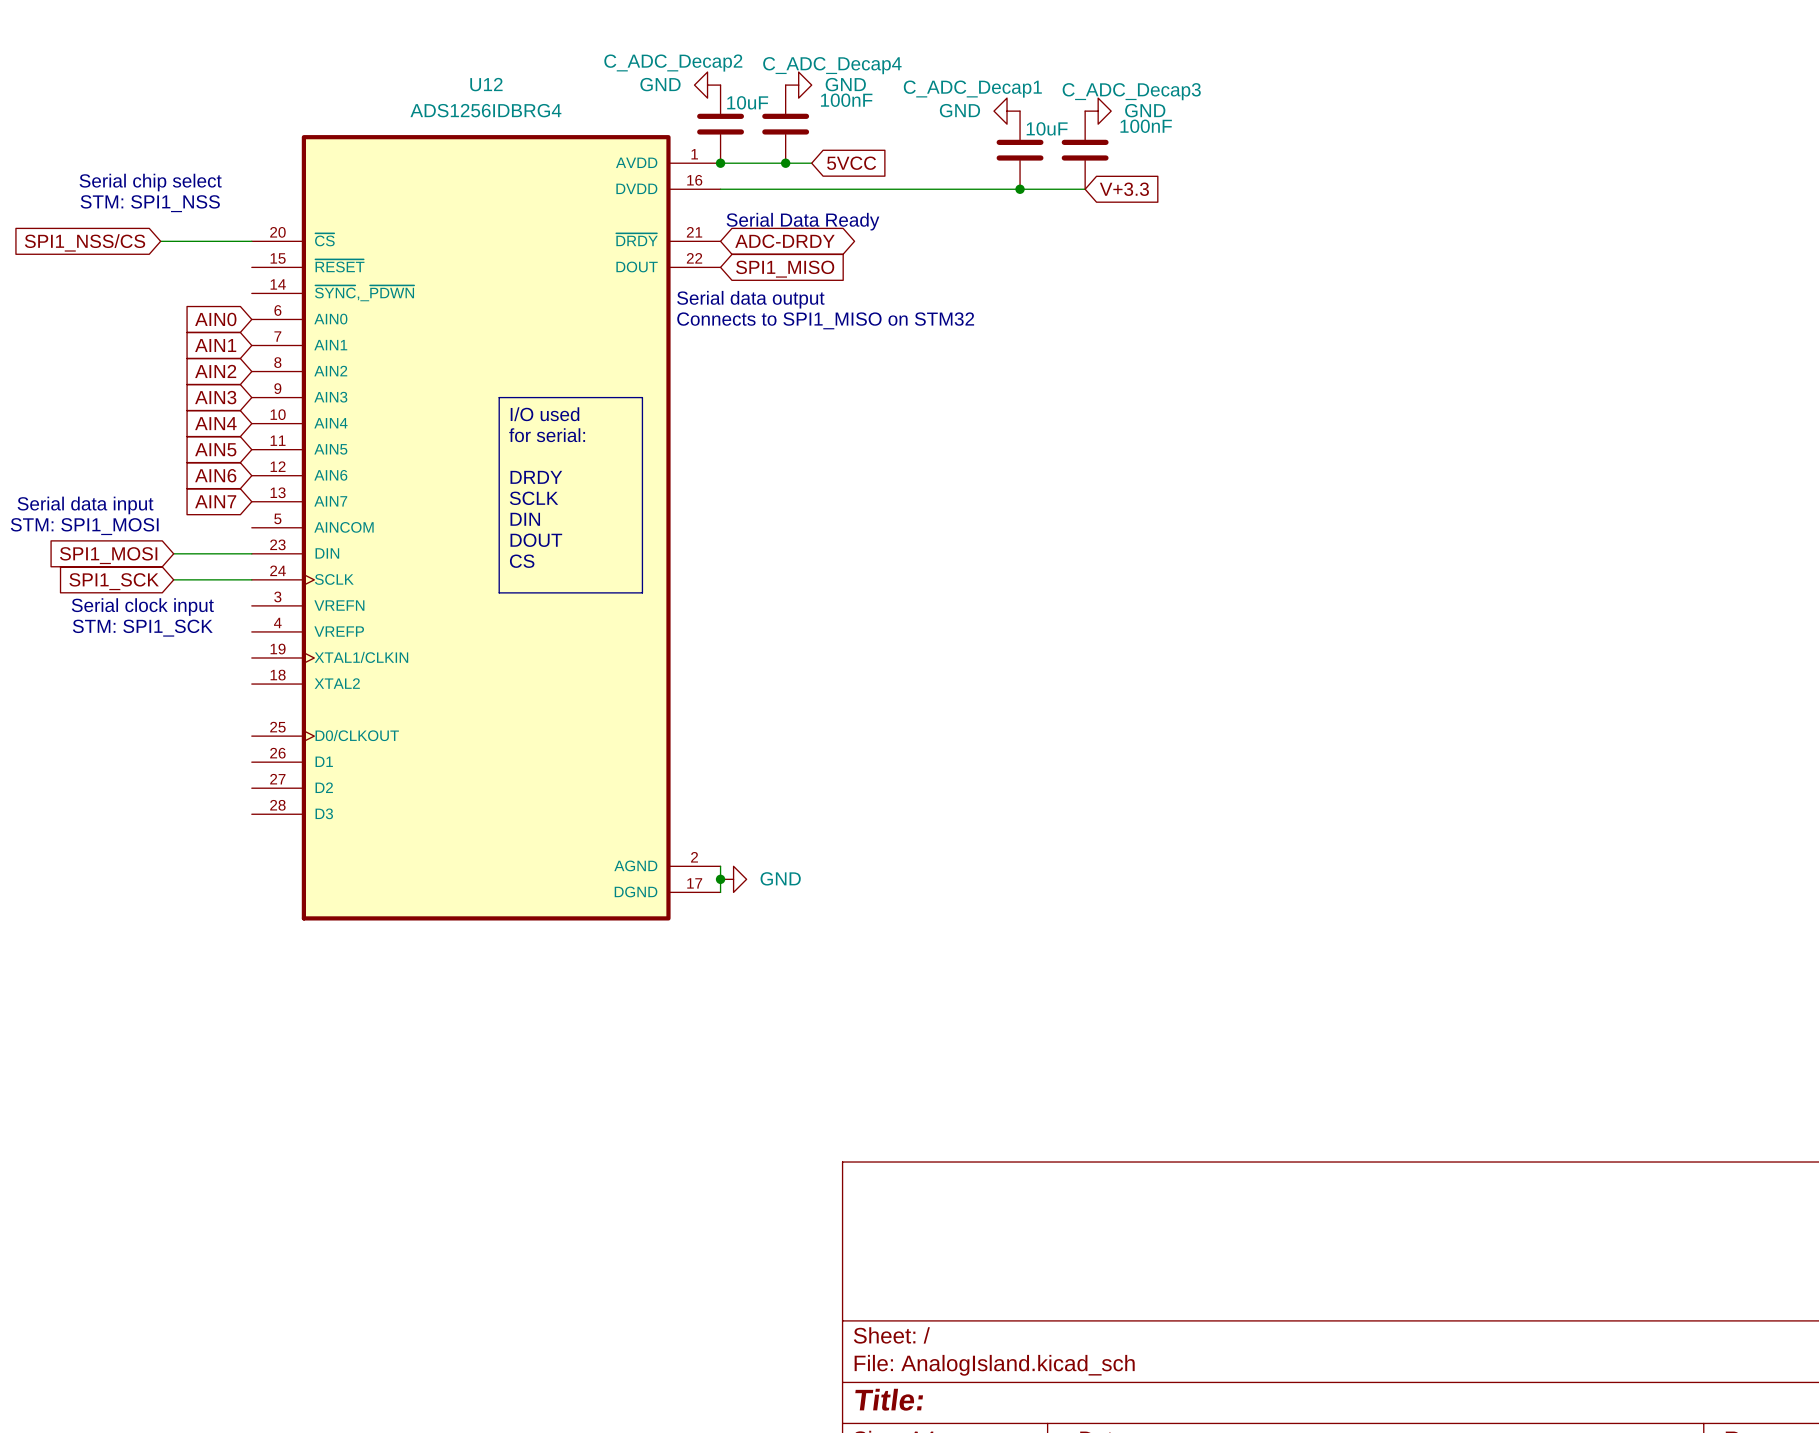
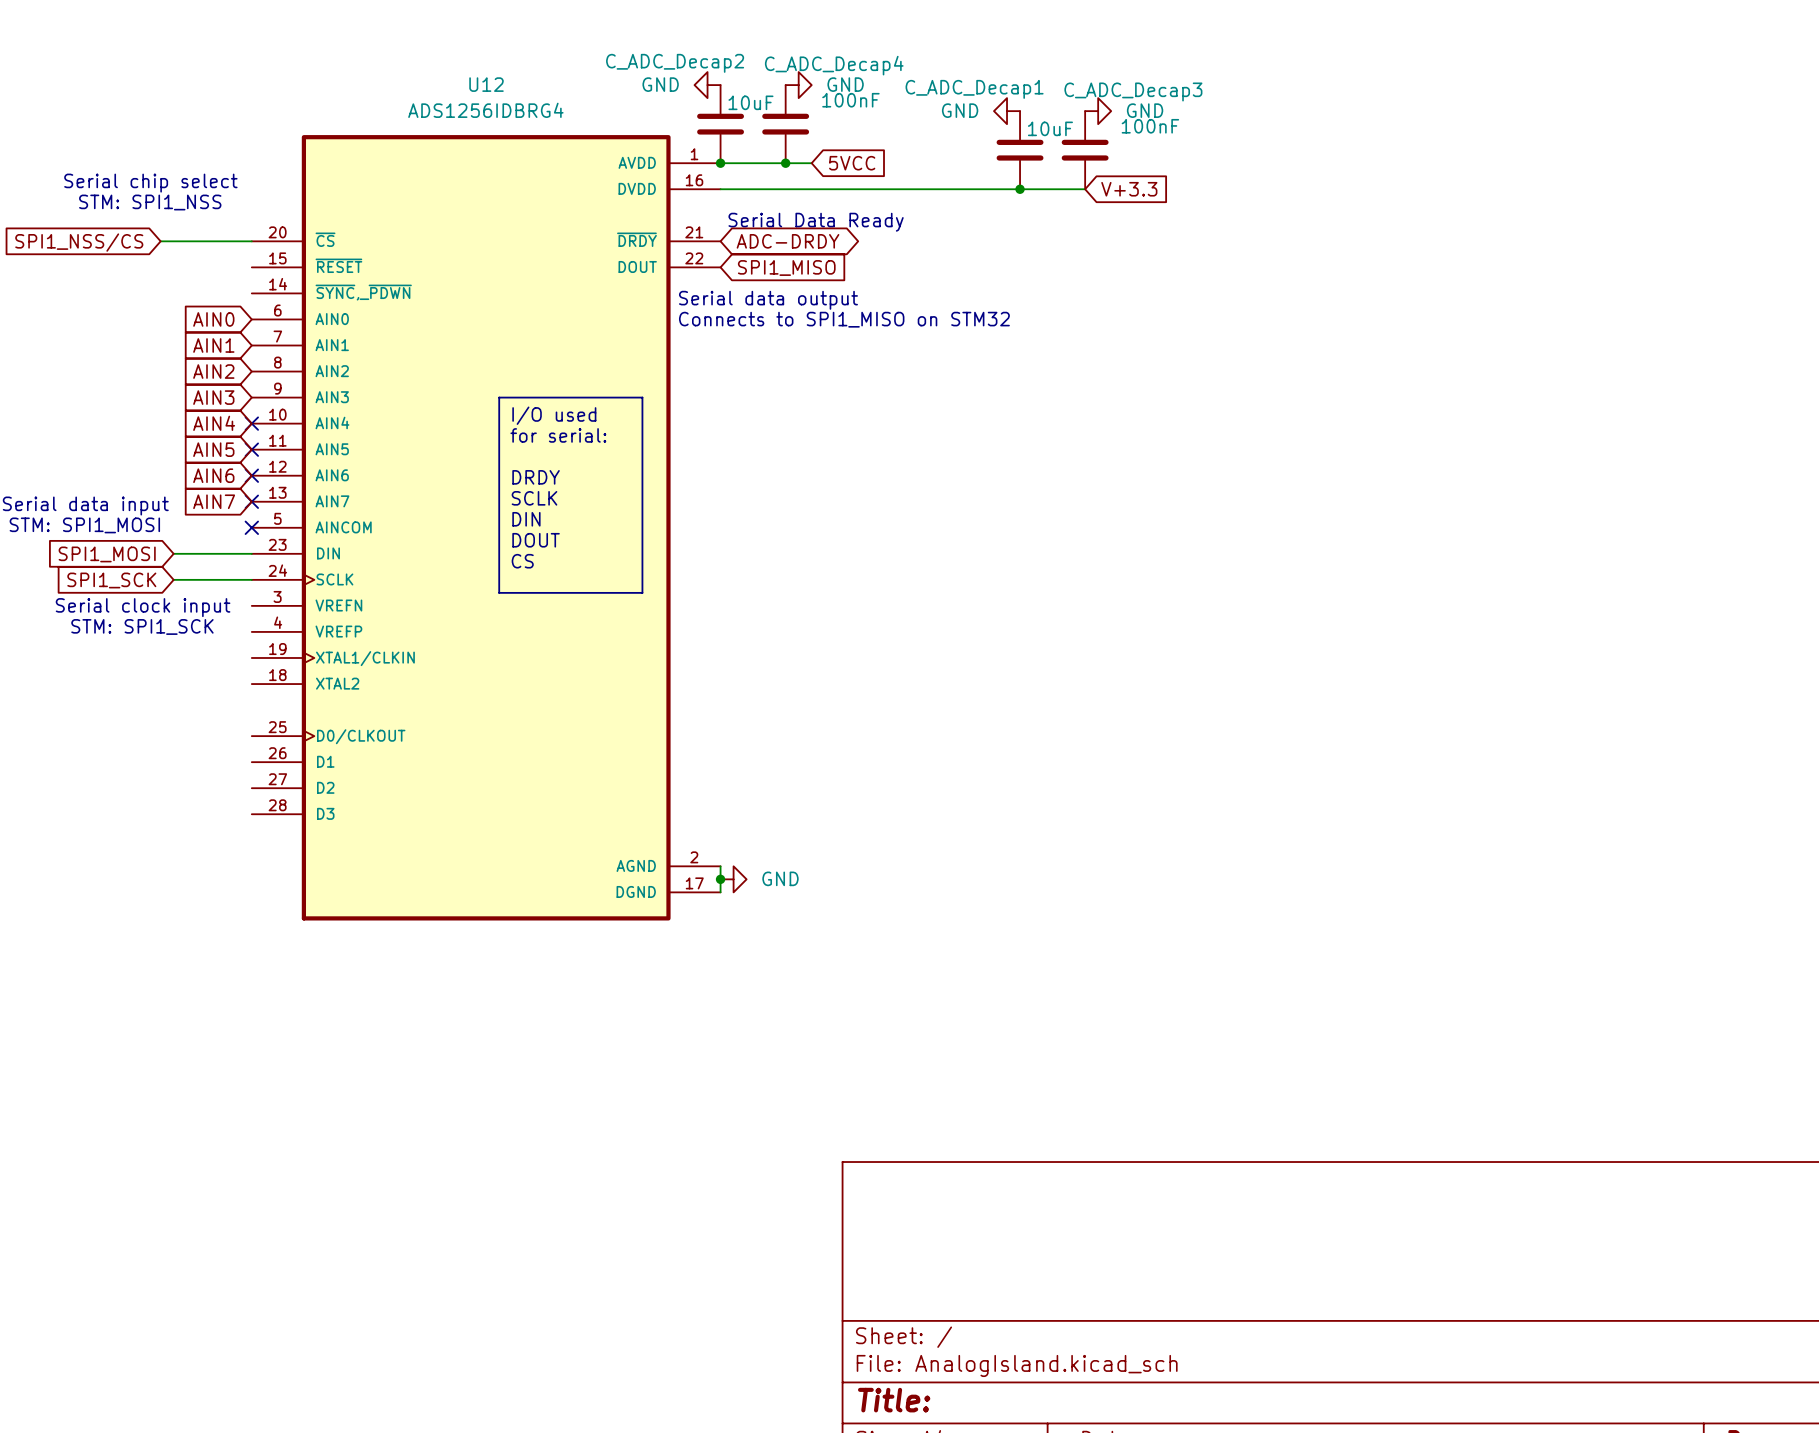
no-connect mark: none -> (251, 423)
no-connect mark: none -> (251, 449)
no-connect mark: none -> (251, 475)
no-connect mark: none -> (251, 501)
no-connect mark: none -> (251, 527)

